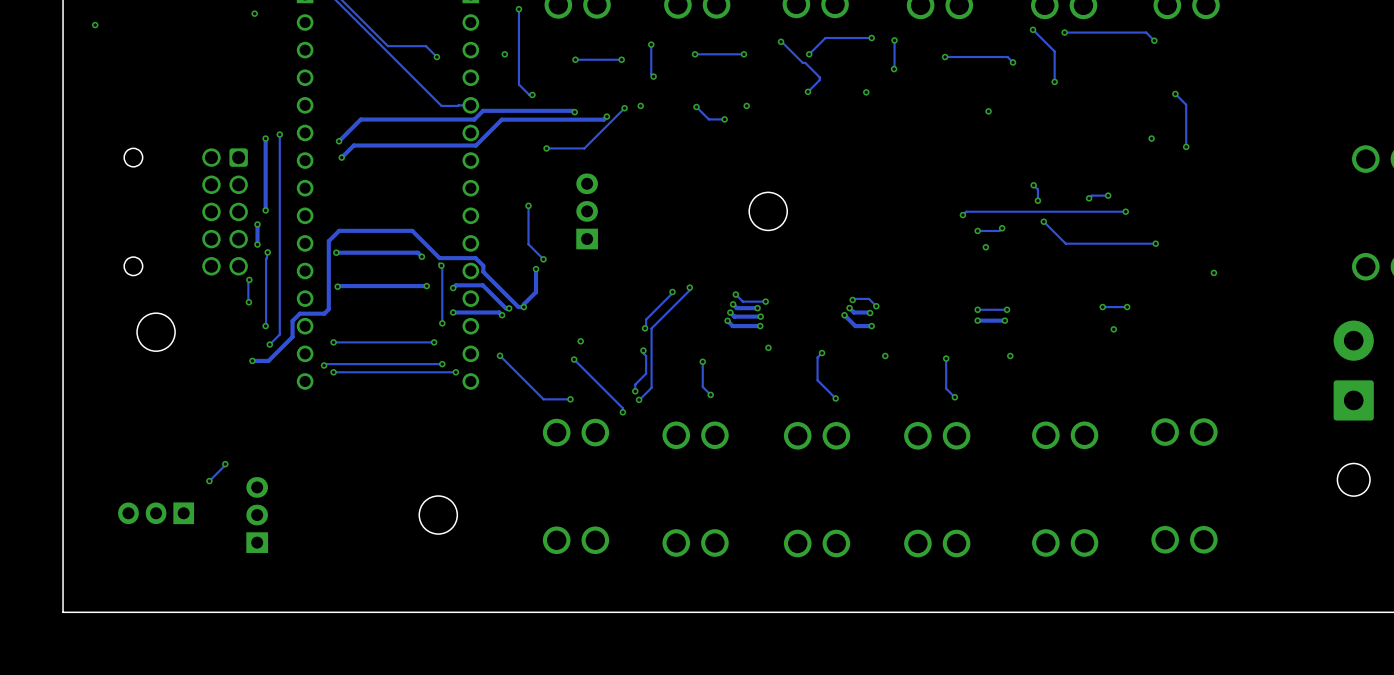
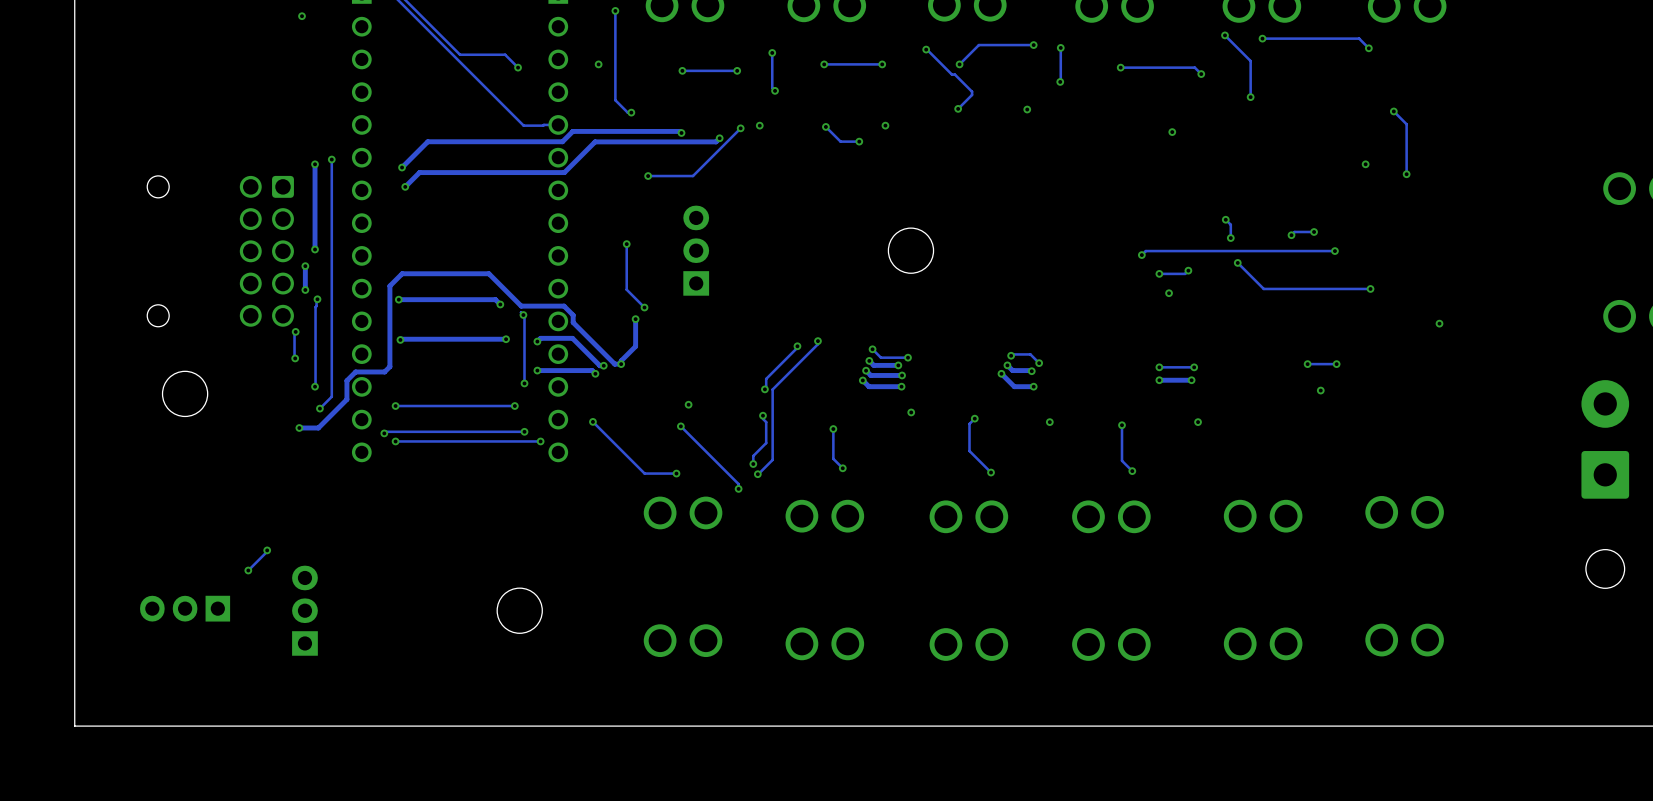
via: (95, 25) -> none

